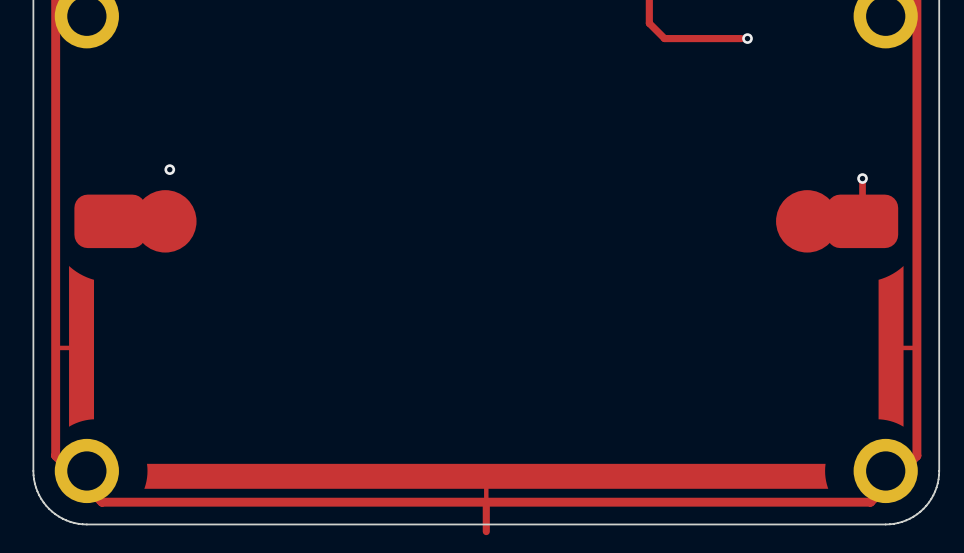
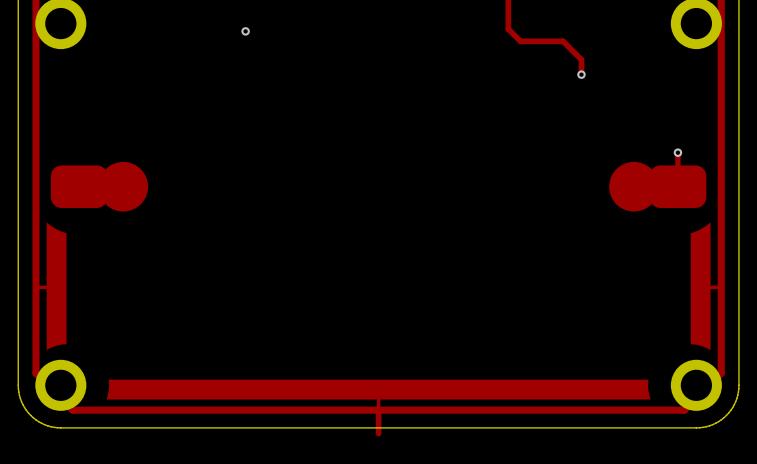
via: none -> (245, 31)
track: (718, 38) (747, 38) -> (563, 41) (581, 59) (581, 74)
via position: (747, 38) -> (581, 74)
via: (169, 169) -> none

